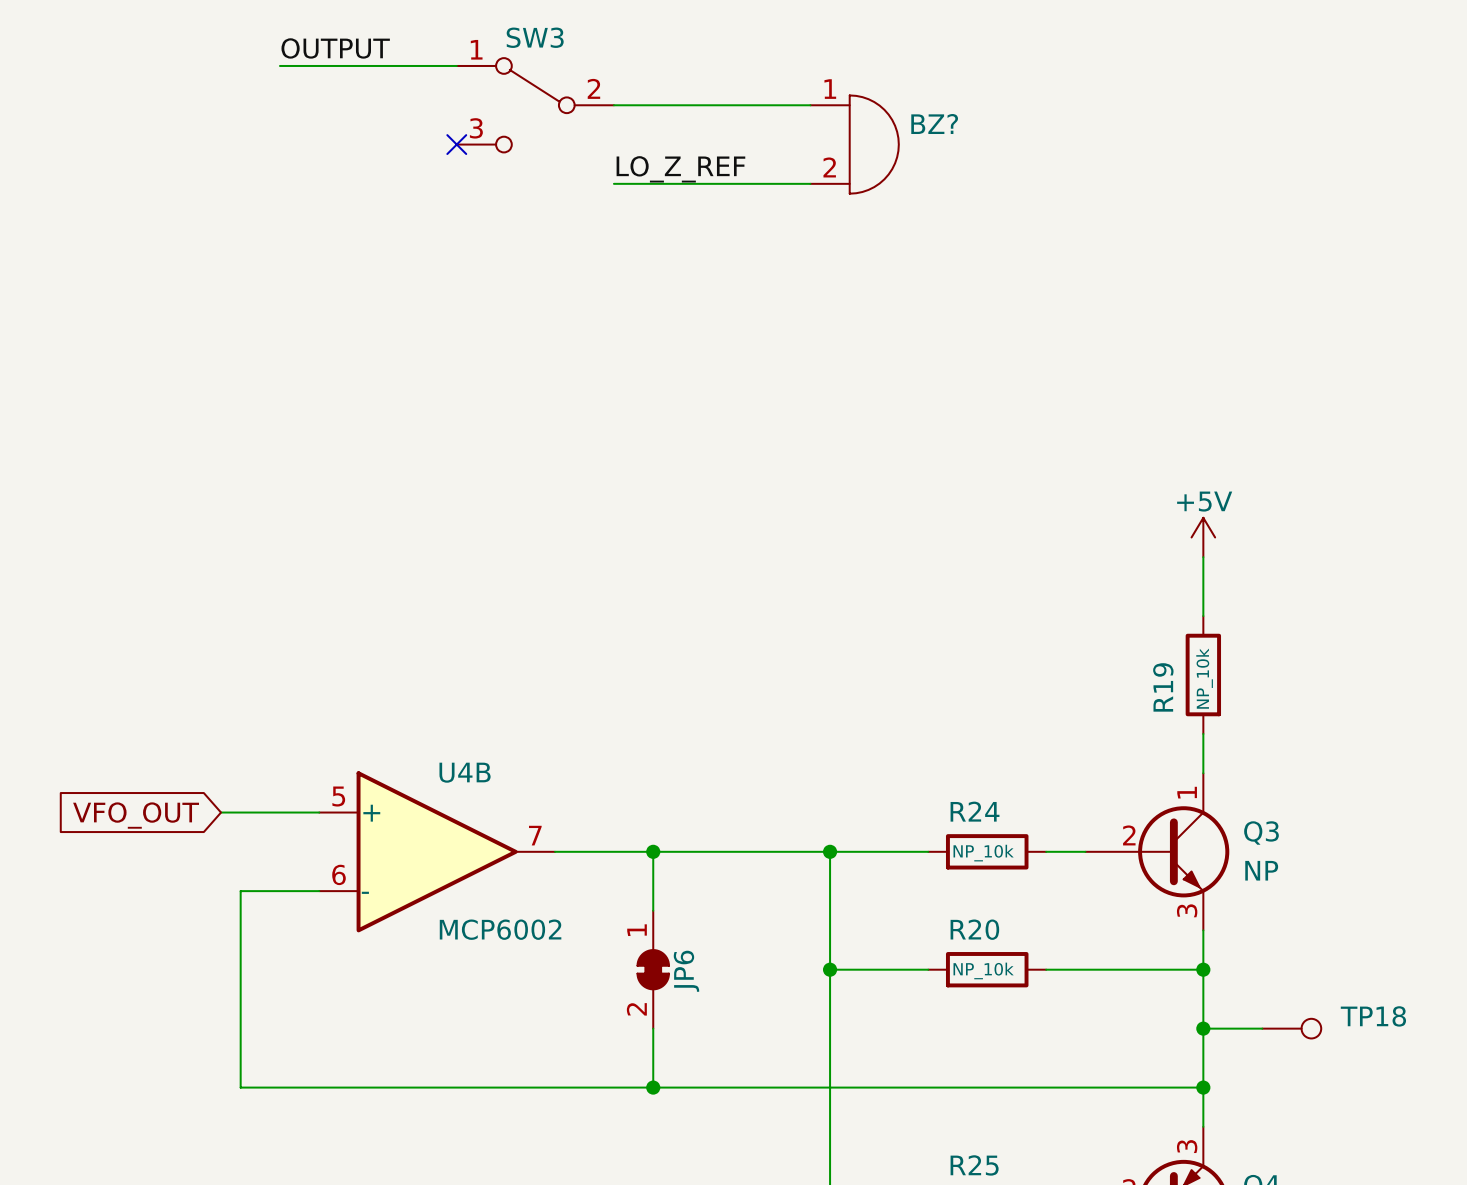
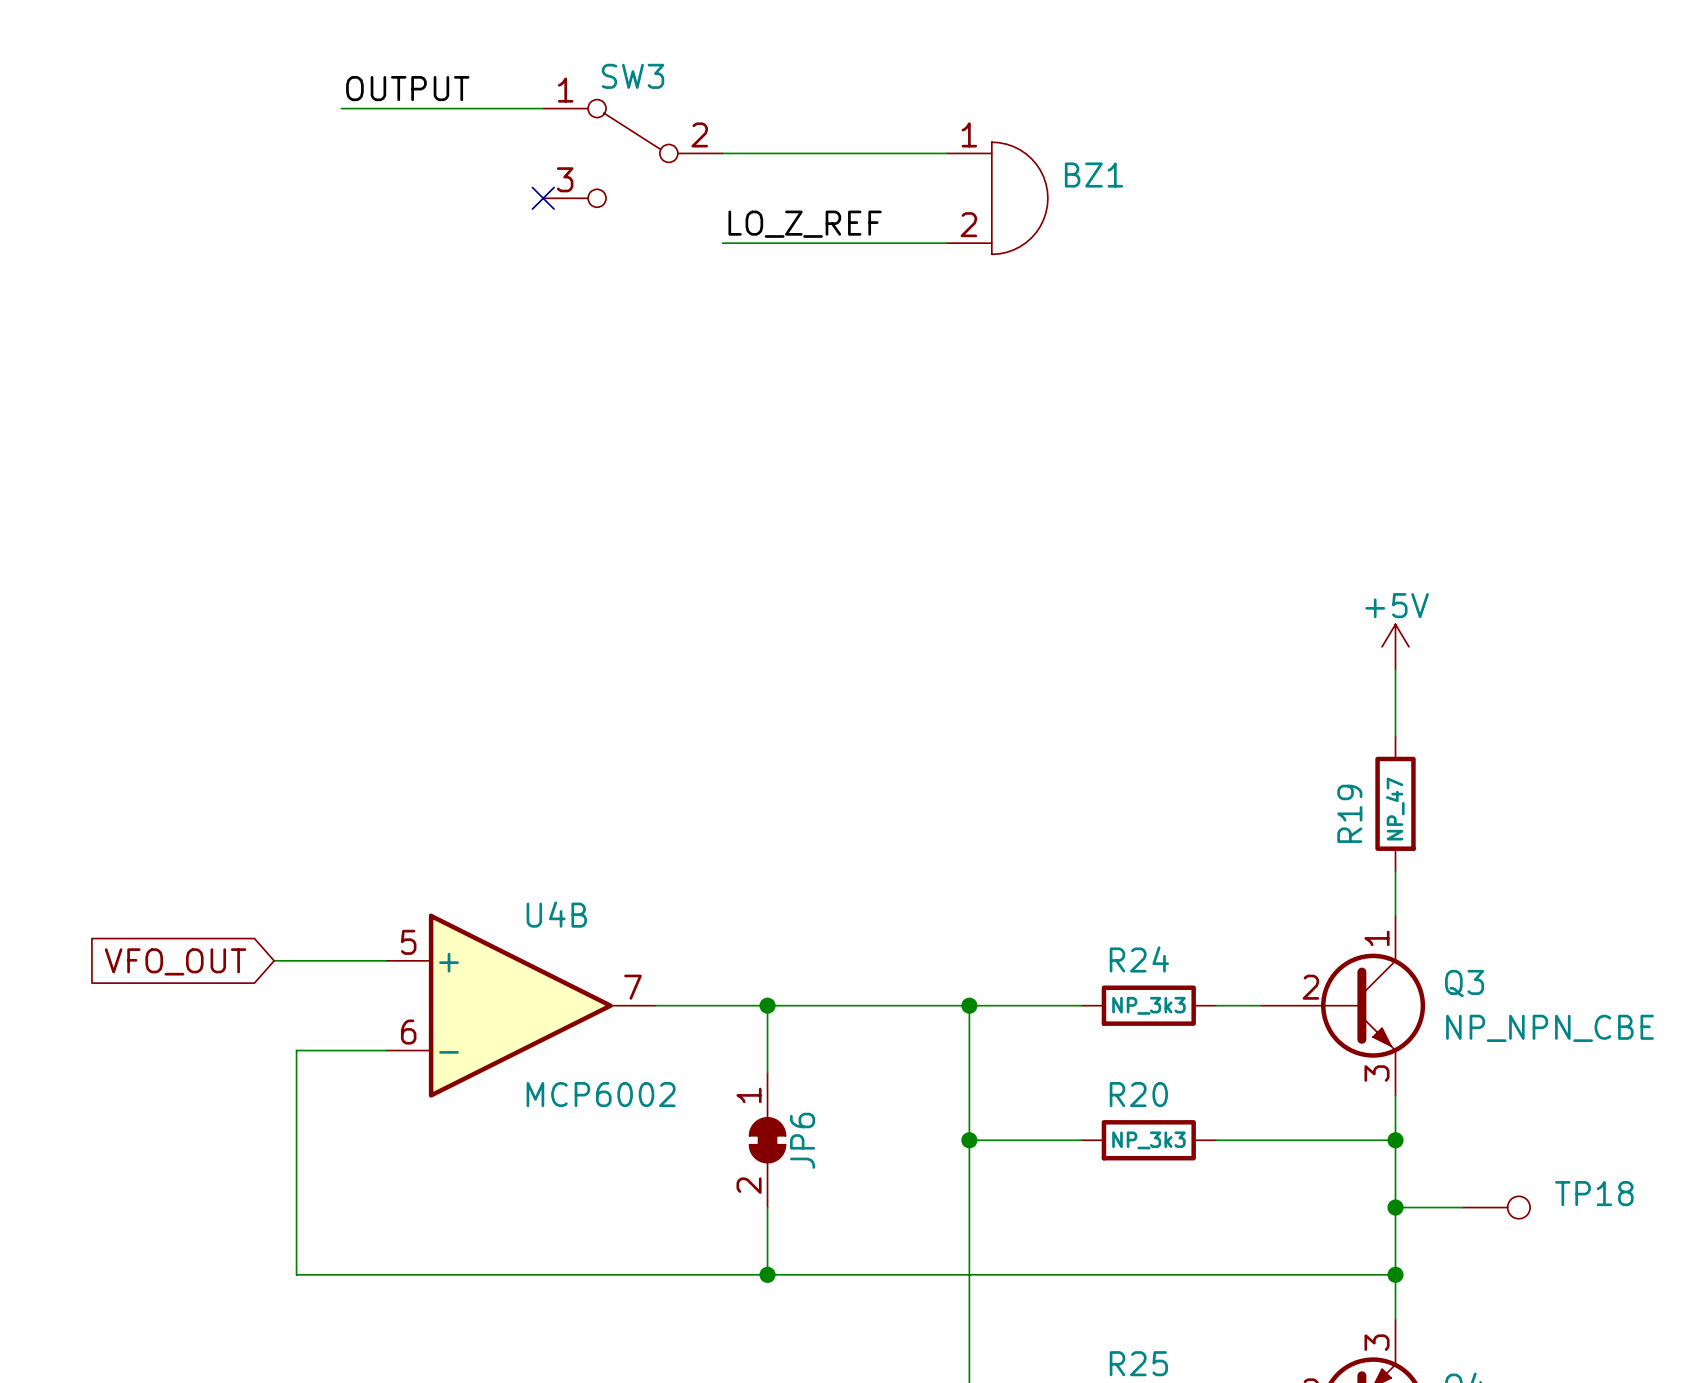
BZ? name: BZ? (934, 124) -> BZ1 (1093, 175)
R19 value: NP_10k (1204, 678) -> NP_47 (1395, 809)
R24 value: NP_10k (983, 853) -> NP_3k3 (1148, 1005)
Q3 value: NP (1261, 870) -> NP_NPN_CBE (1550, 1028)
R20 value: NP_10k (983, 970) -> NP_3k3 (1148, 1140)

